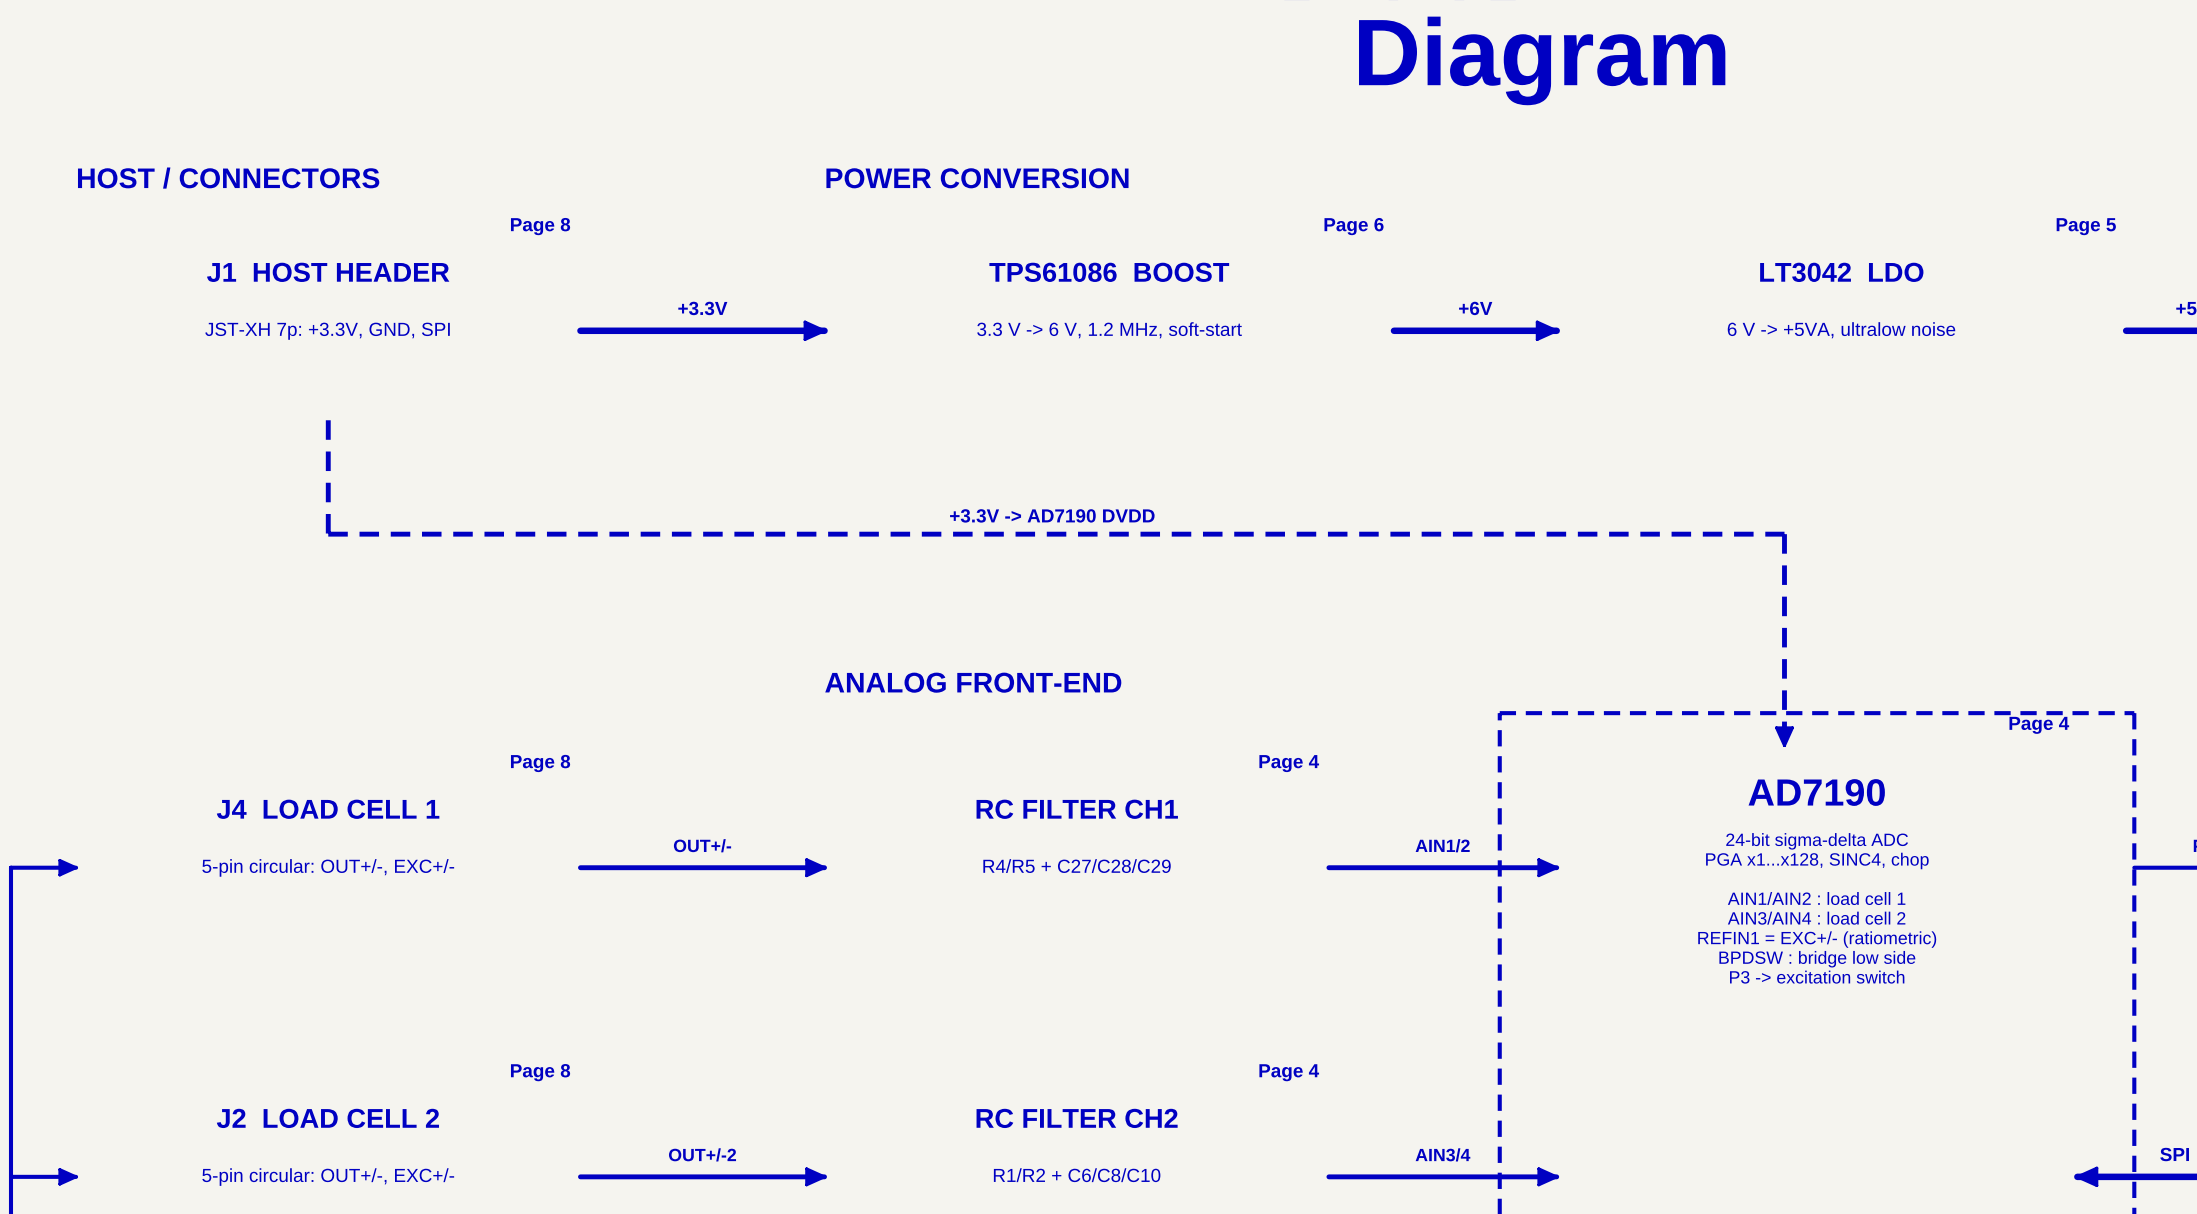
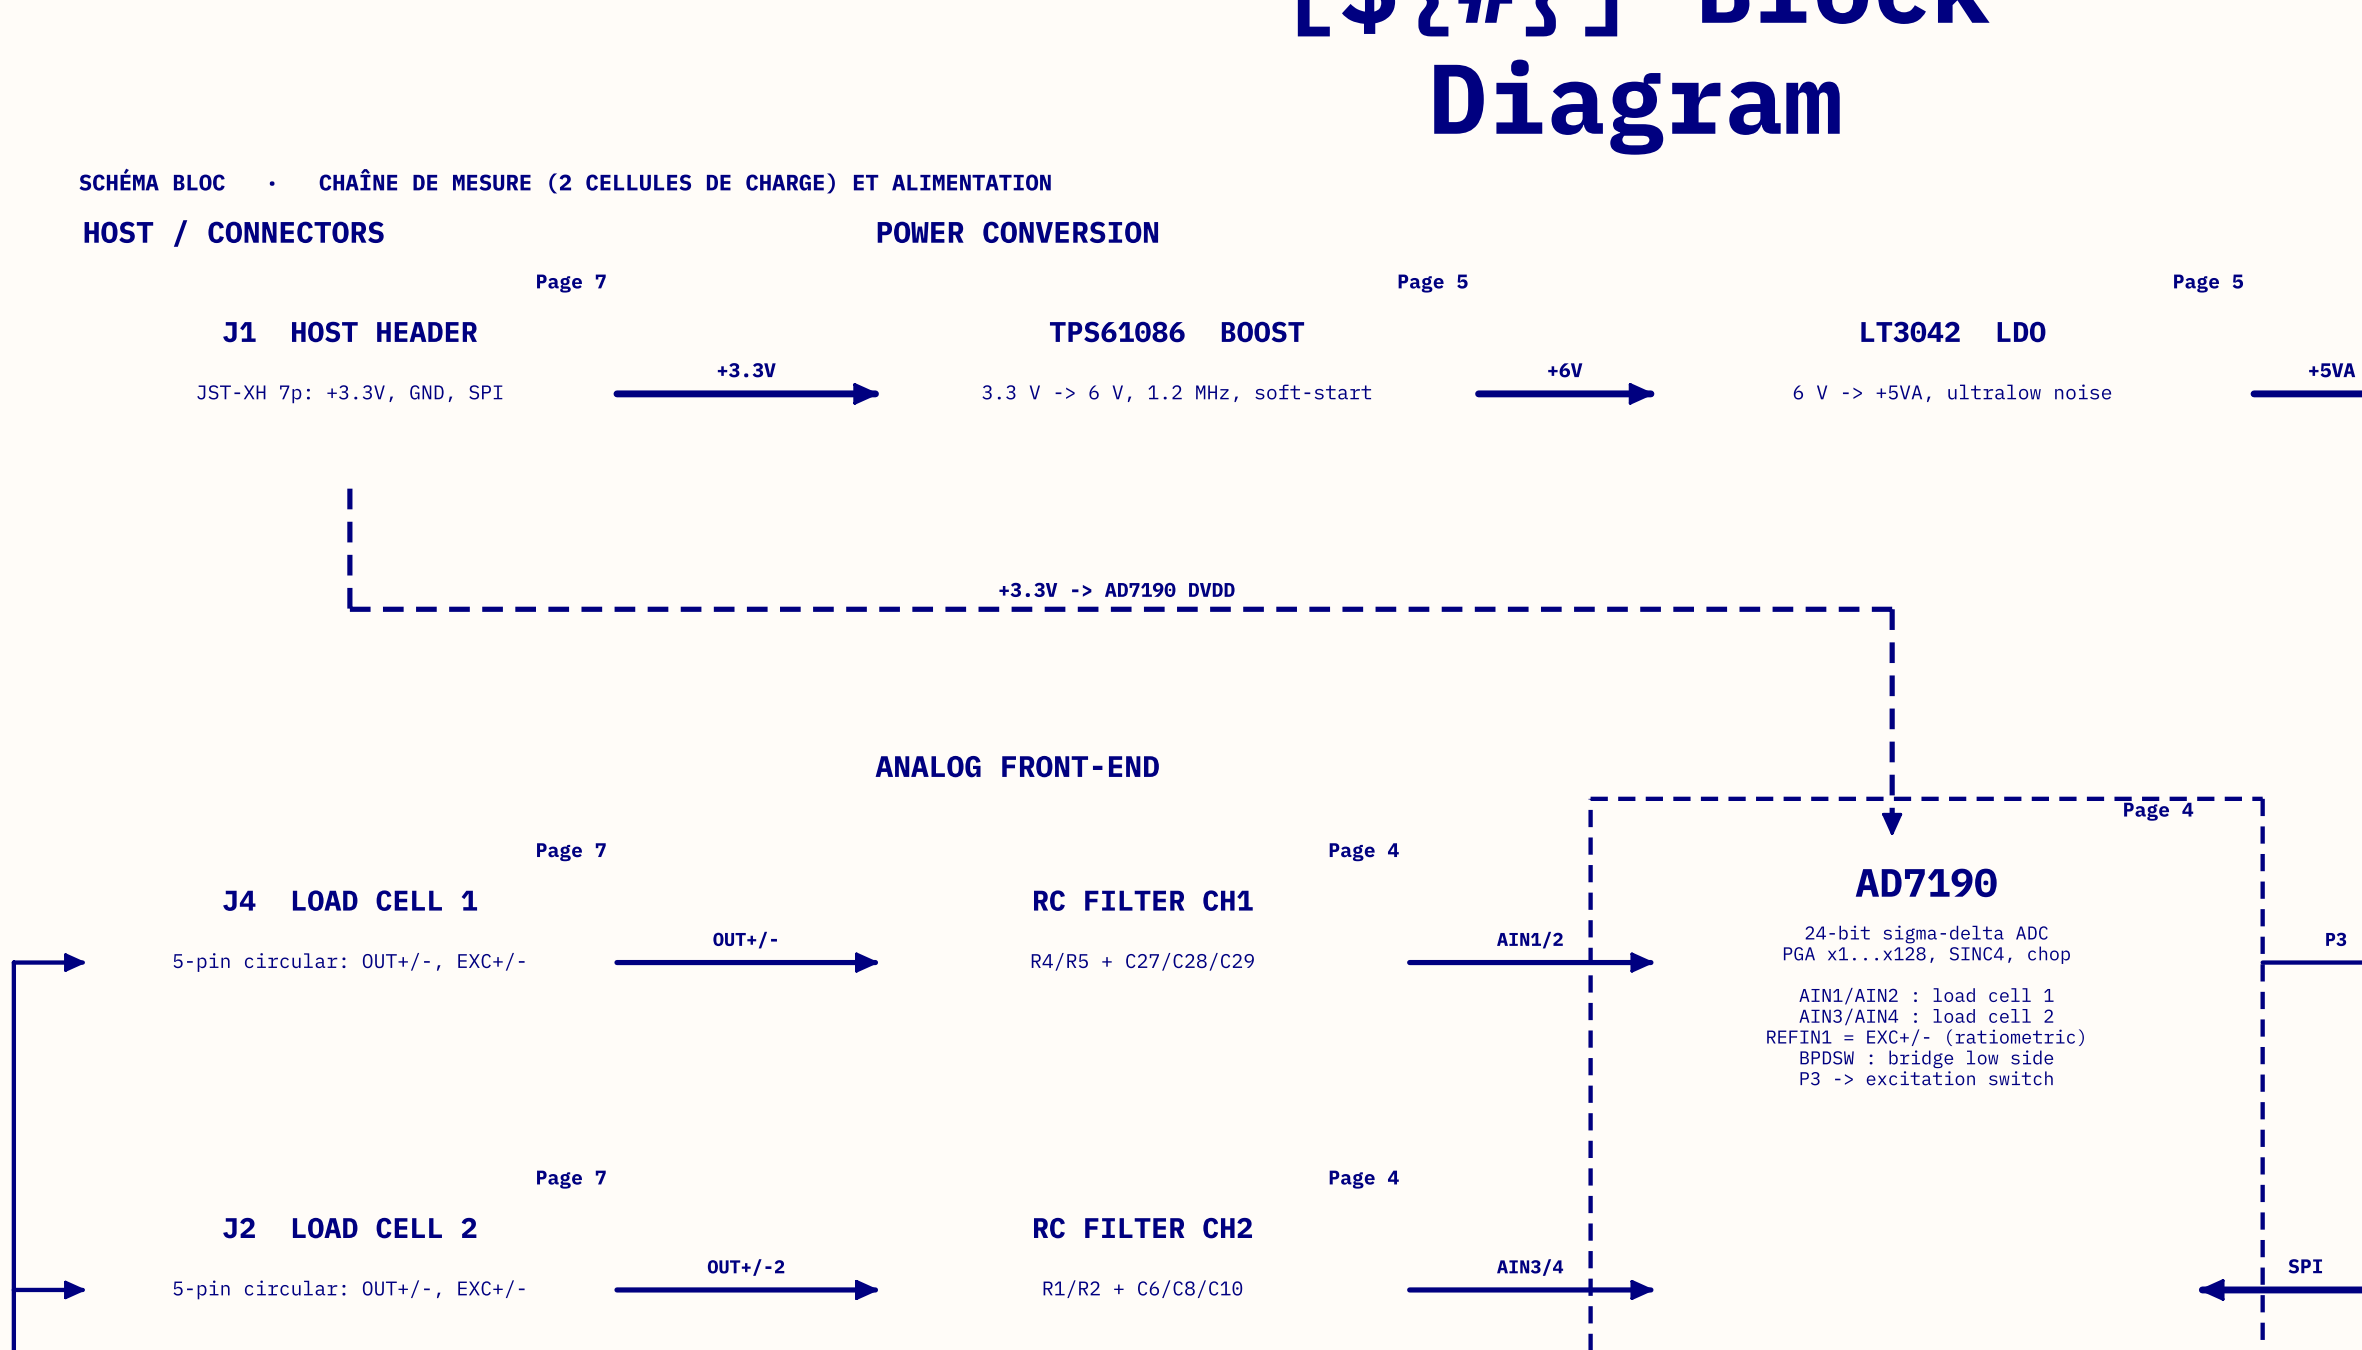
text: none -> SCHÉMA BLOC · CHAÎNE DE MESURE (2 CELLULES DE CHARGE) ET ALIMENTATION (565, 181)
text: Page 8 (540, 226) -> Page 7 (571, 283)
text: Page 6 (1354, 226) -> Page 5 (1433, 283)
text: Page 8 (540, 763) -> Page 7 (571, 852)
text: Page 8 (540, 1072) -> Page 7 (571, 1179)

